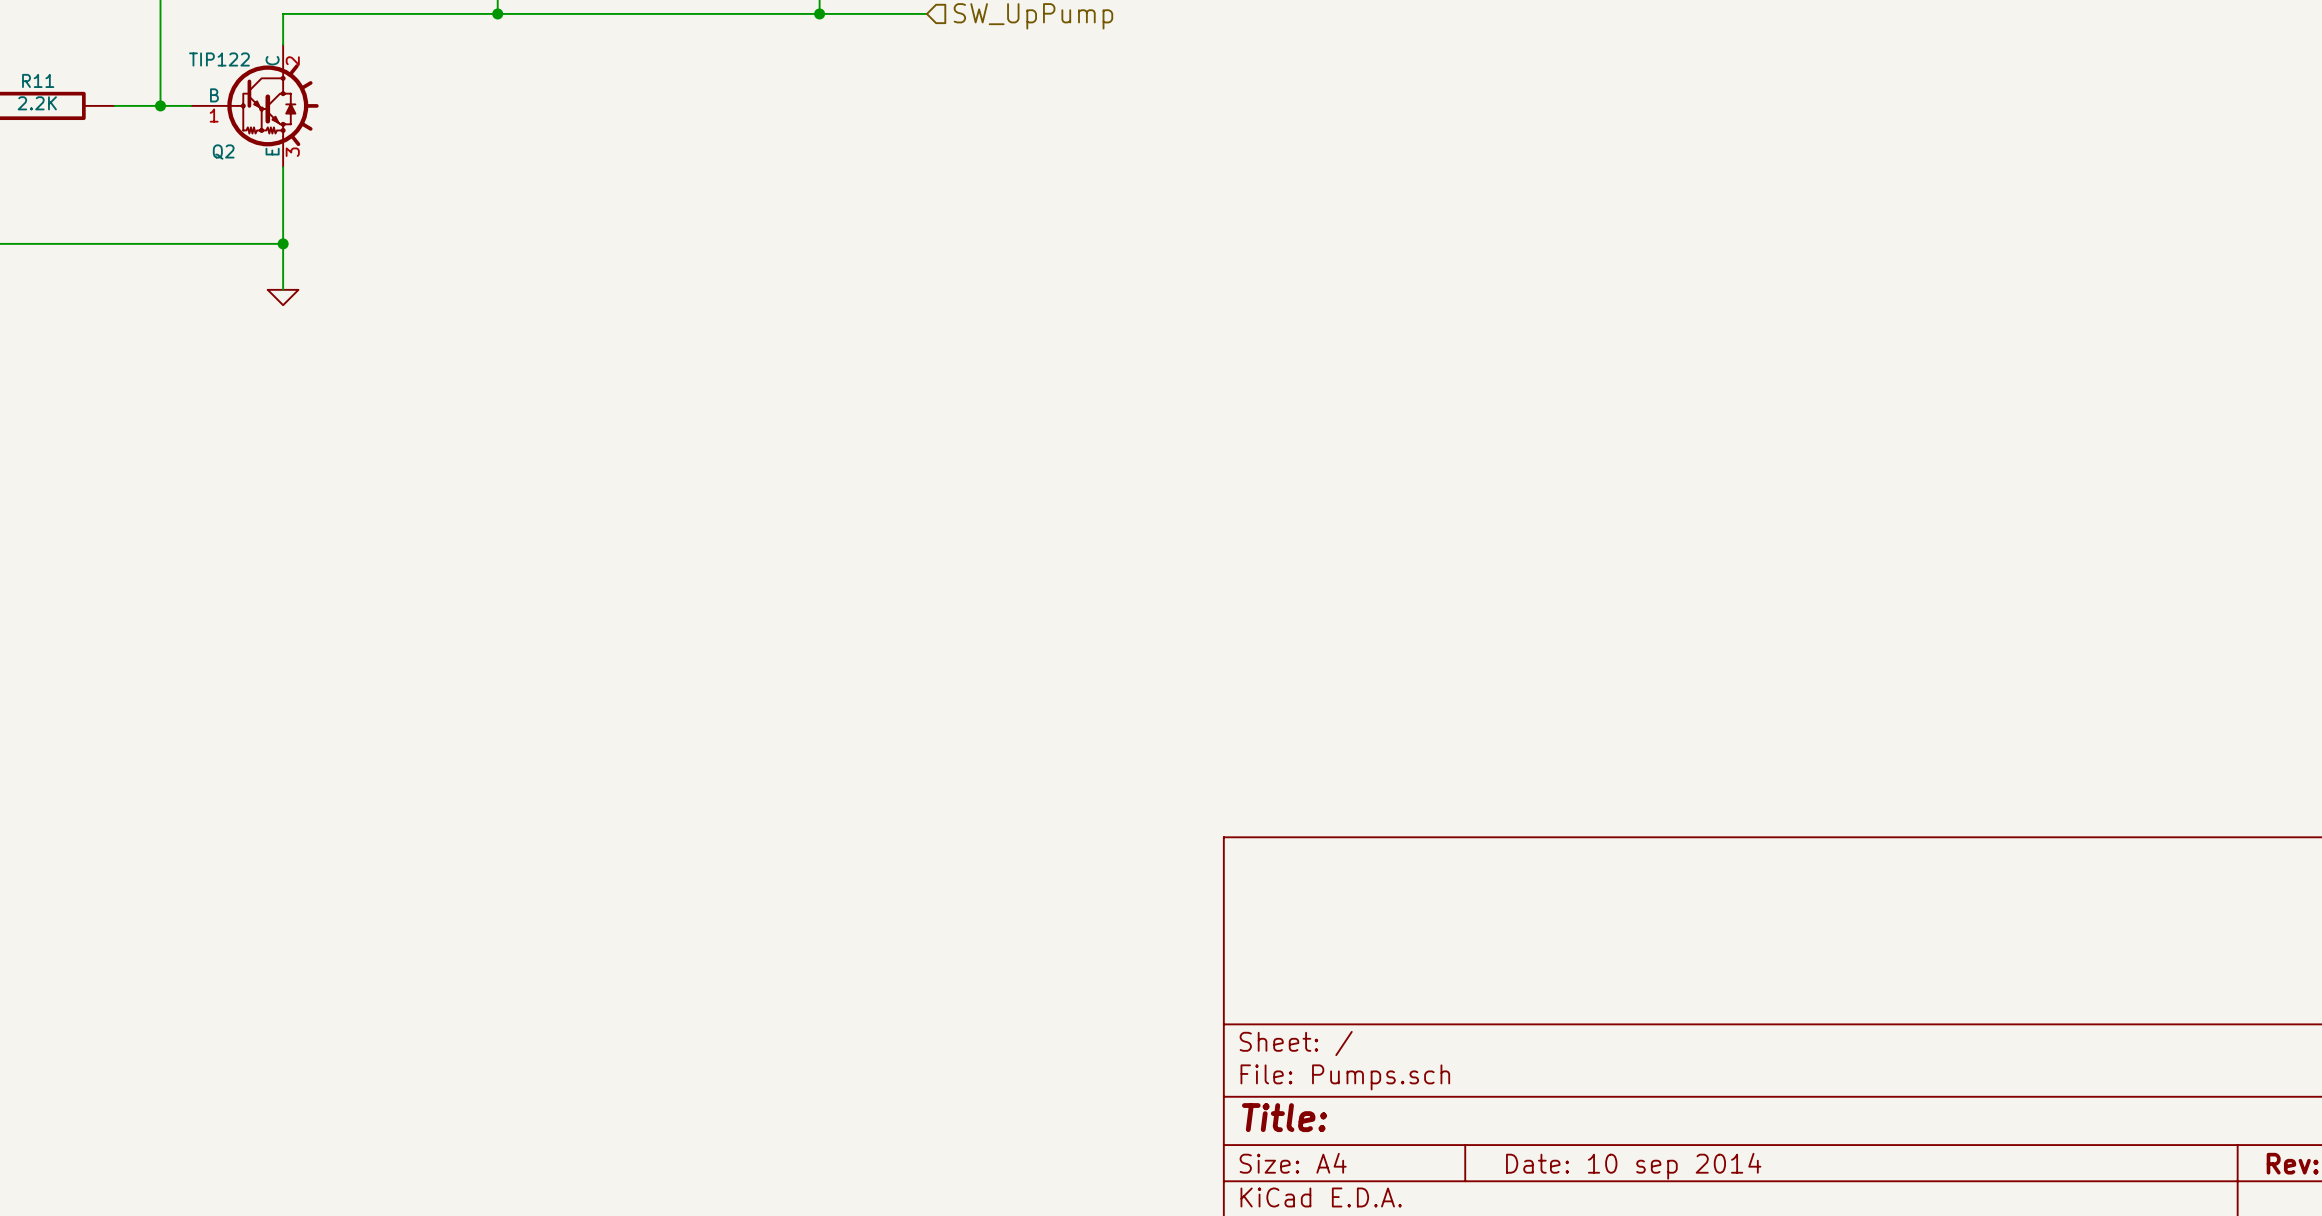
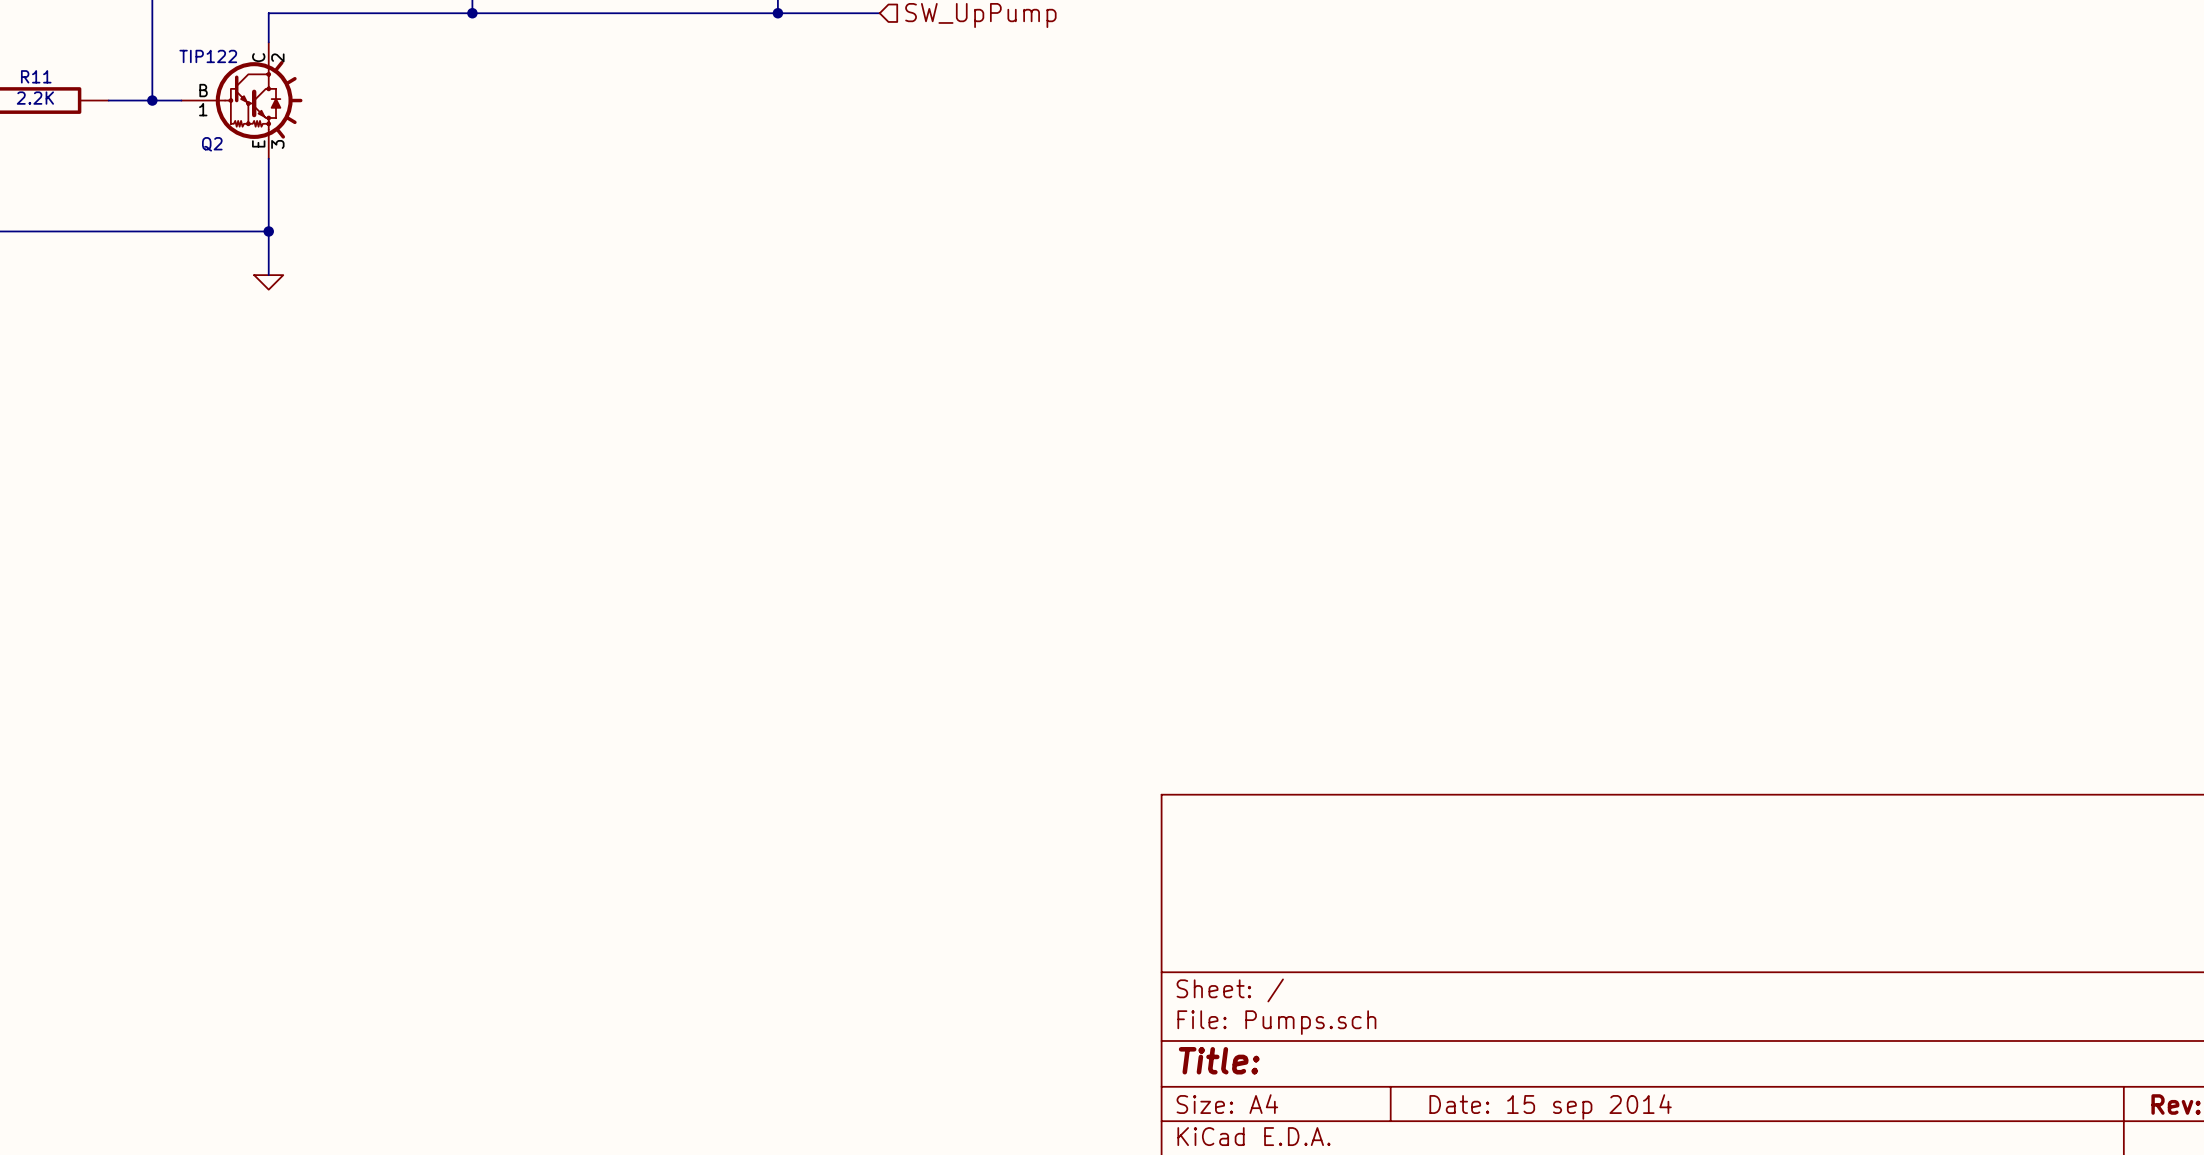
title block: Date: 10 sep 2014 (1633, 1166) -> Date: 15 sep 2014 (1550, 1106)

